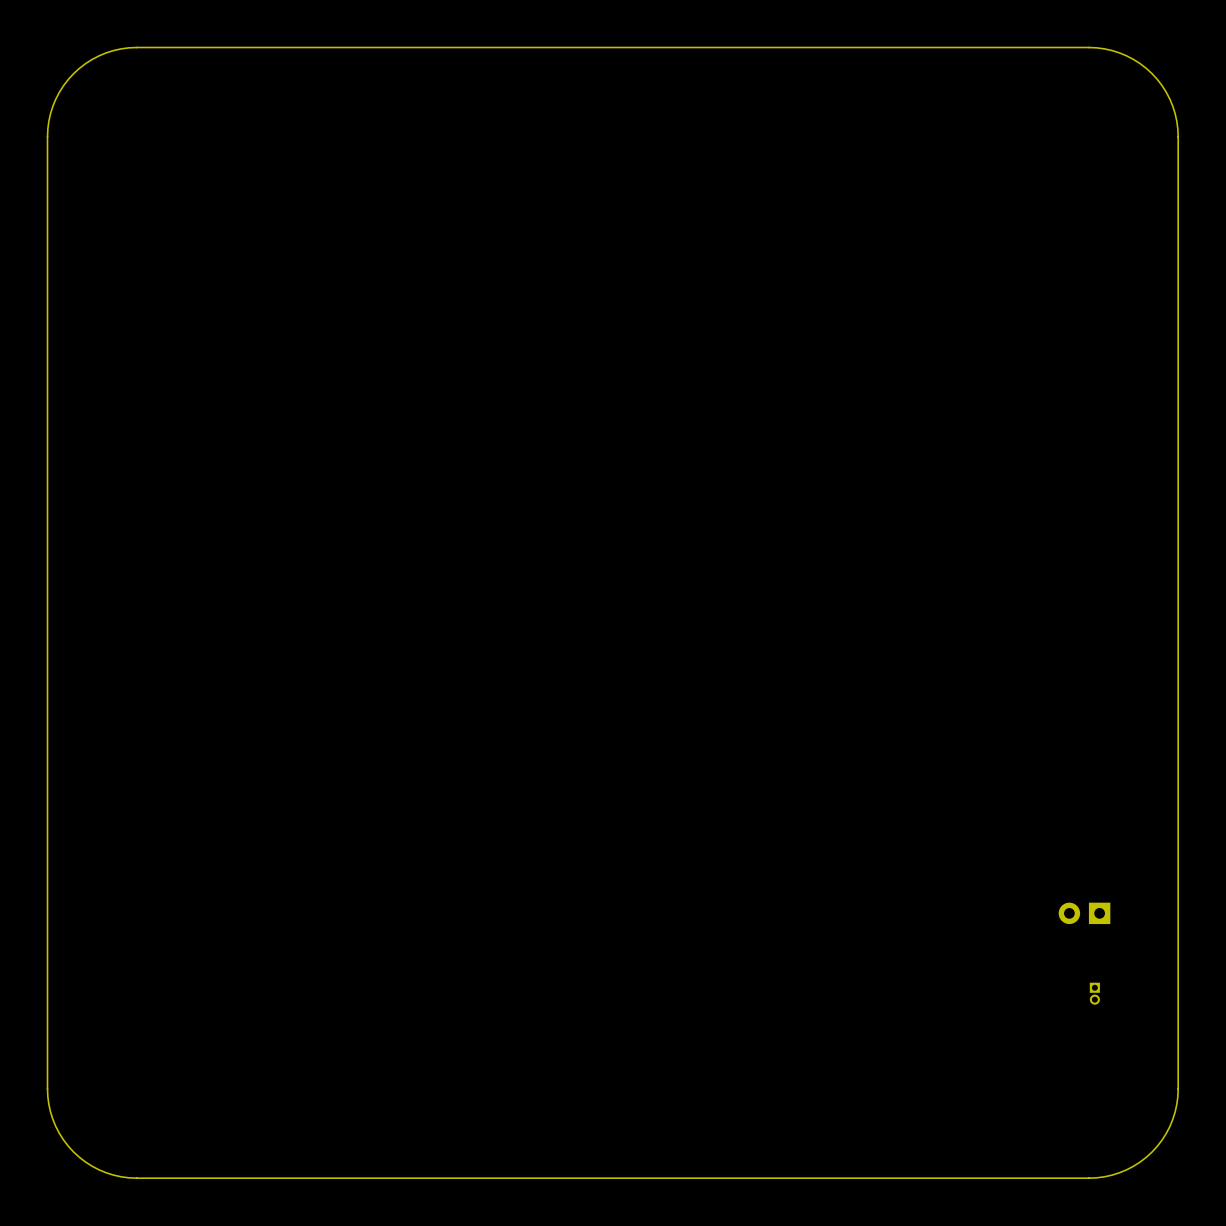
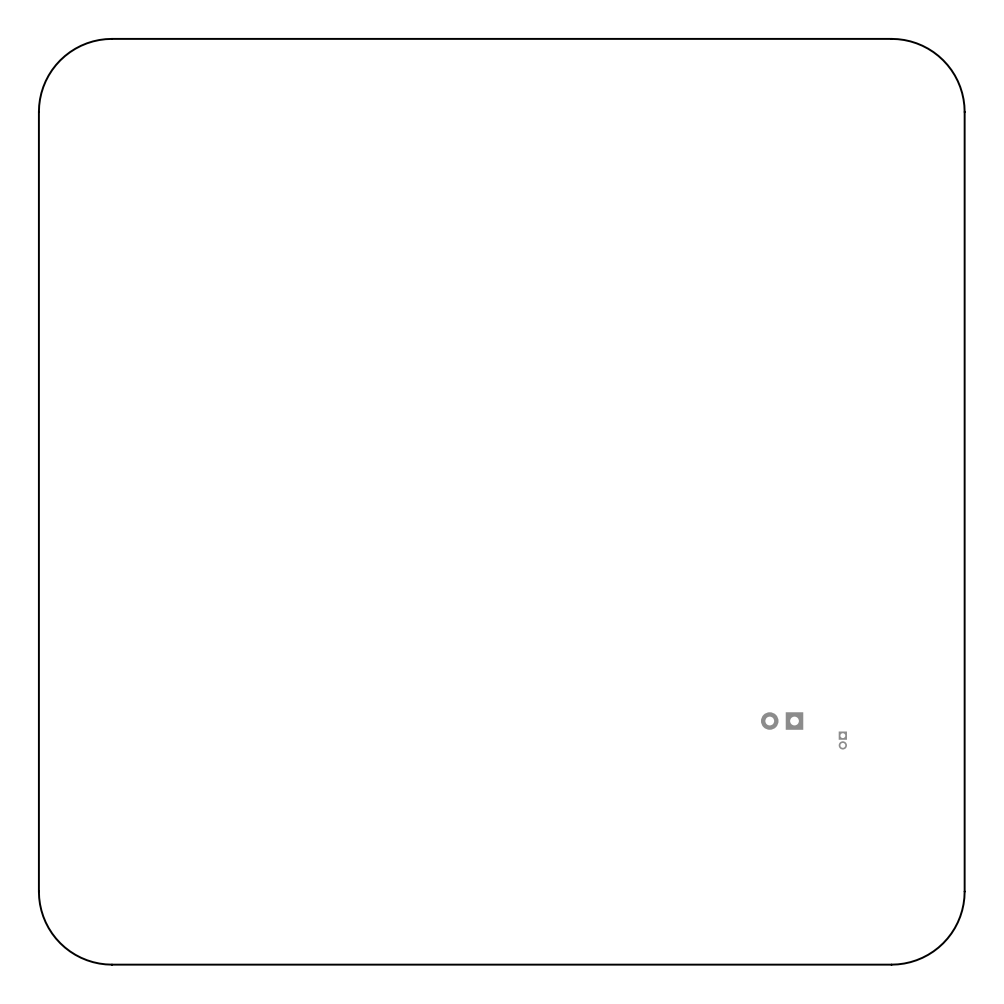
part position: (1084, 913) -> (782, 721)
part position: (1094, 993) -> (842, 740)

